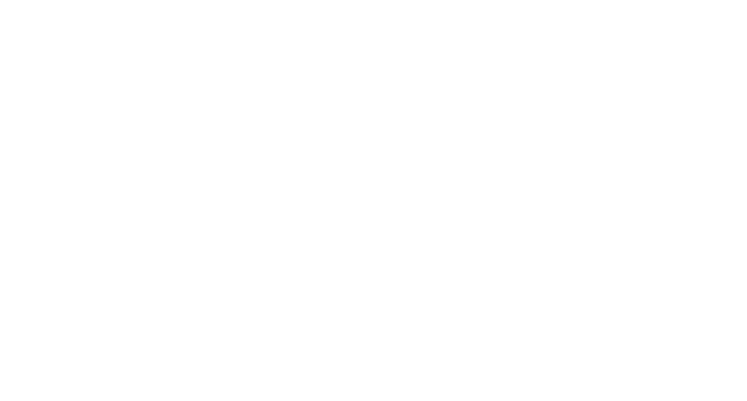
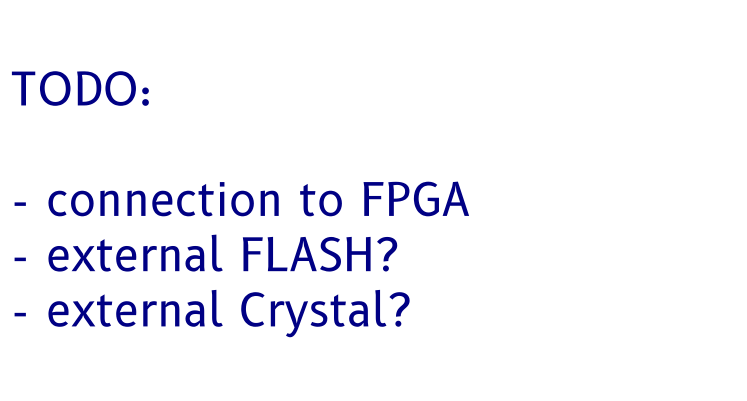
text: none -> TODO: (80, 88)
text: none -> - connection to FPGA (241, 198)
text: none -> - external FLASH? (205, 253)
text: none -> - external Crystal? (212, 313)

